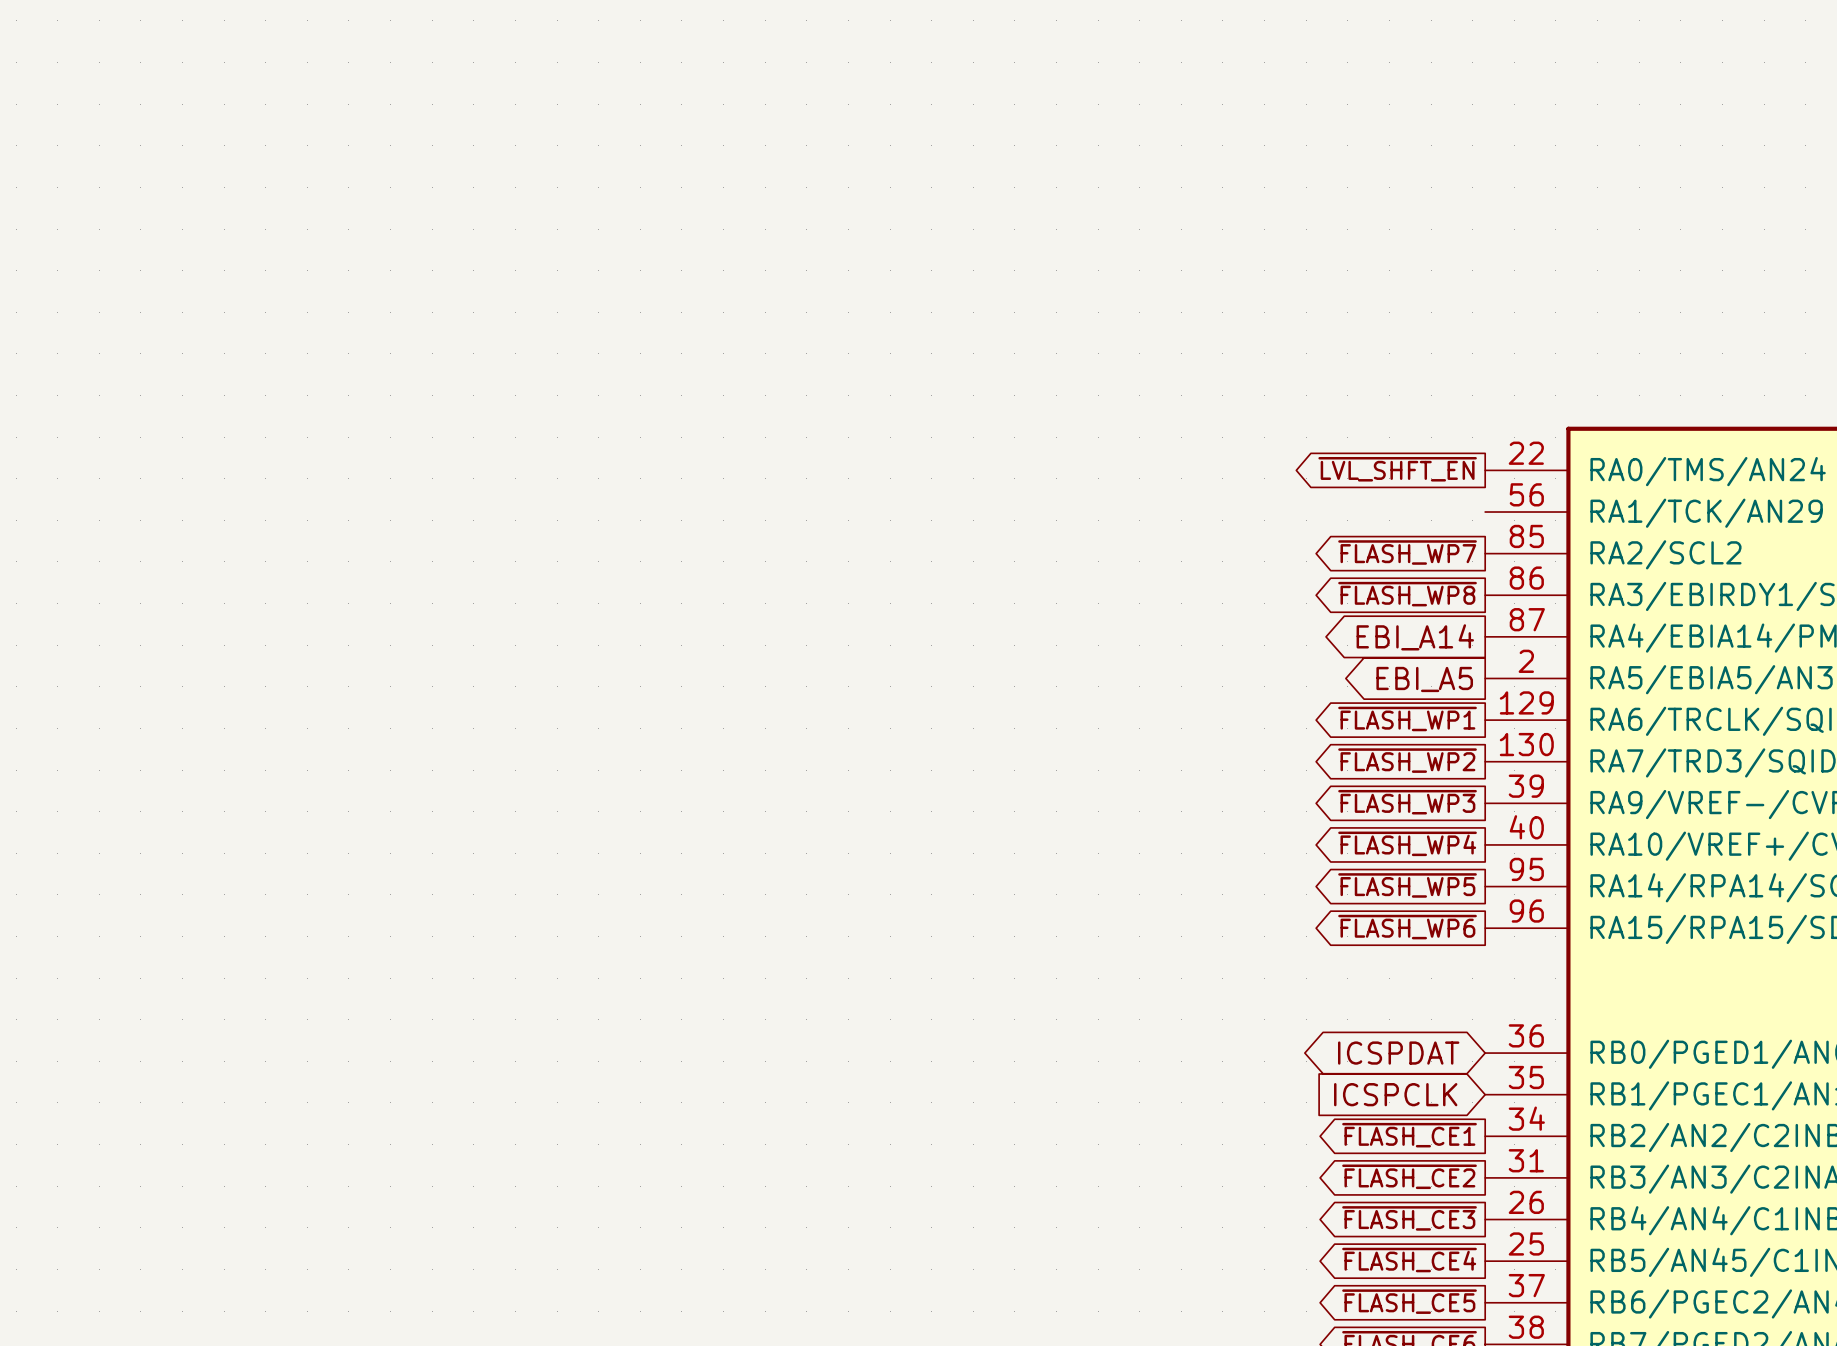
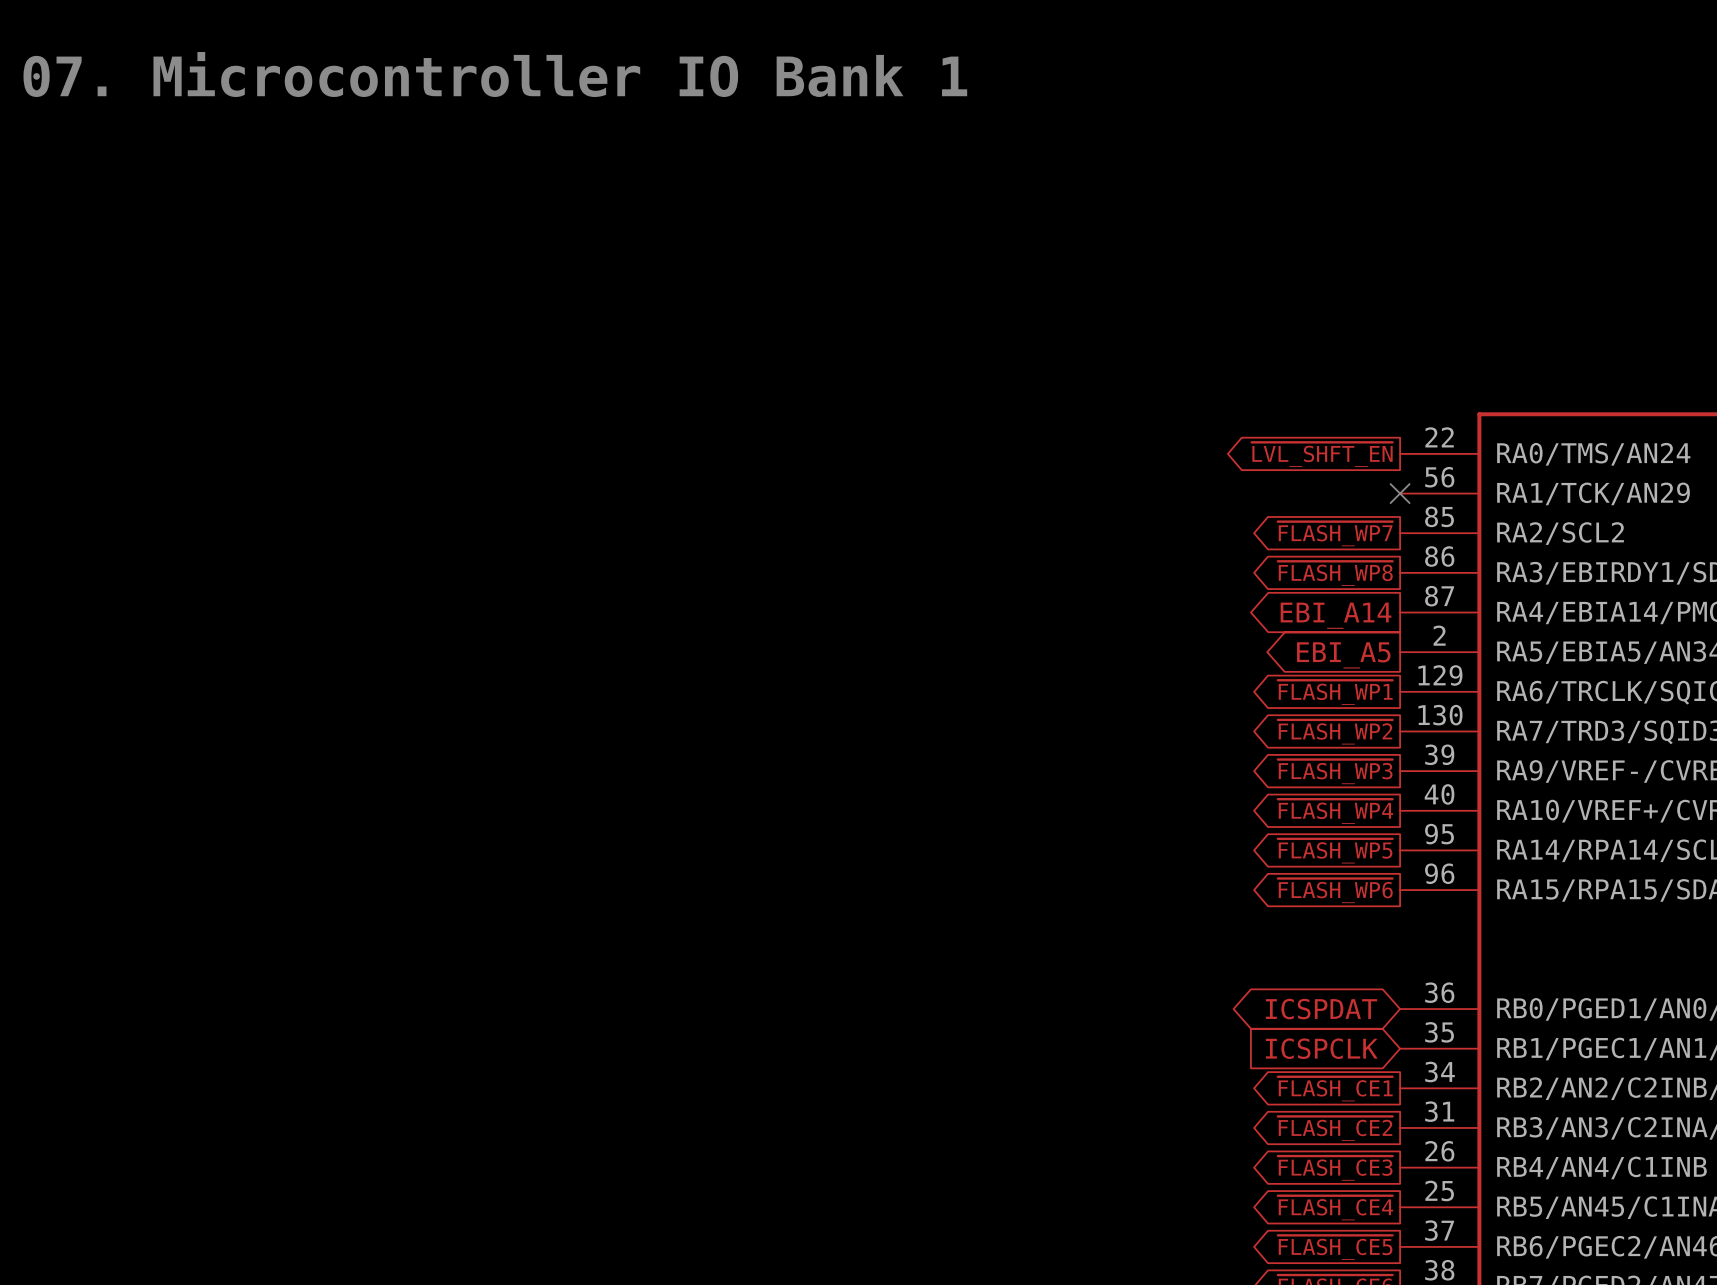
text: none -> 07. Microcontroller IO Bank 1 (495, 74)
no-connect mark: none -> (1400, 493)

